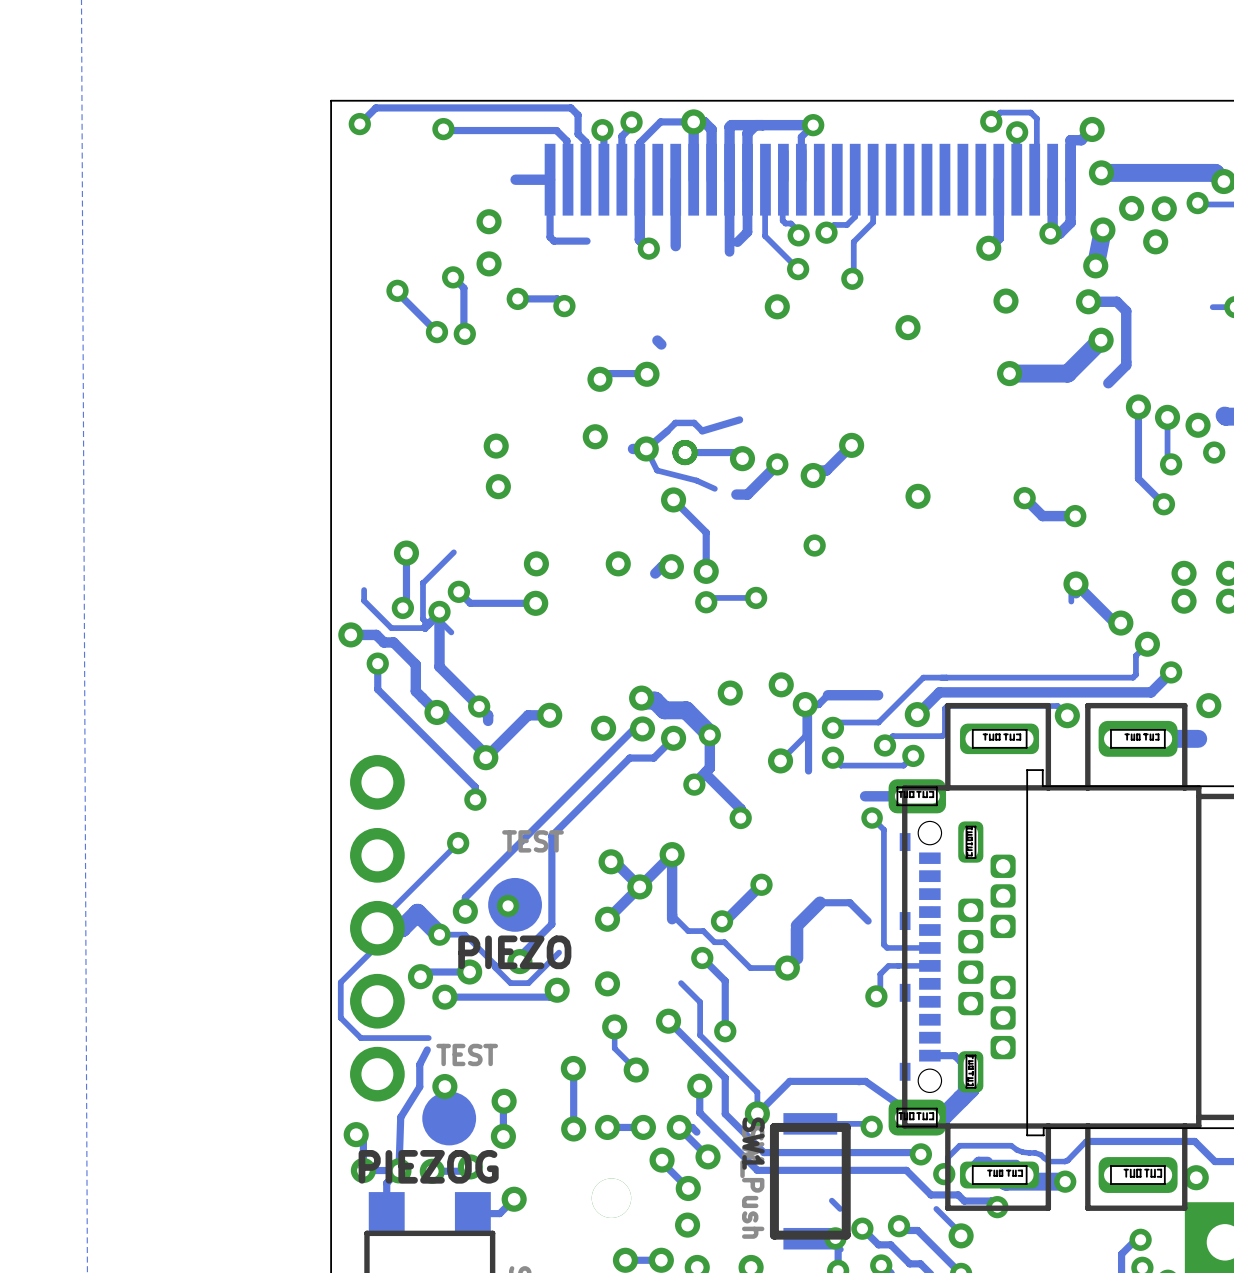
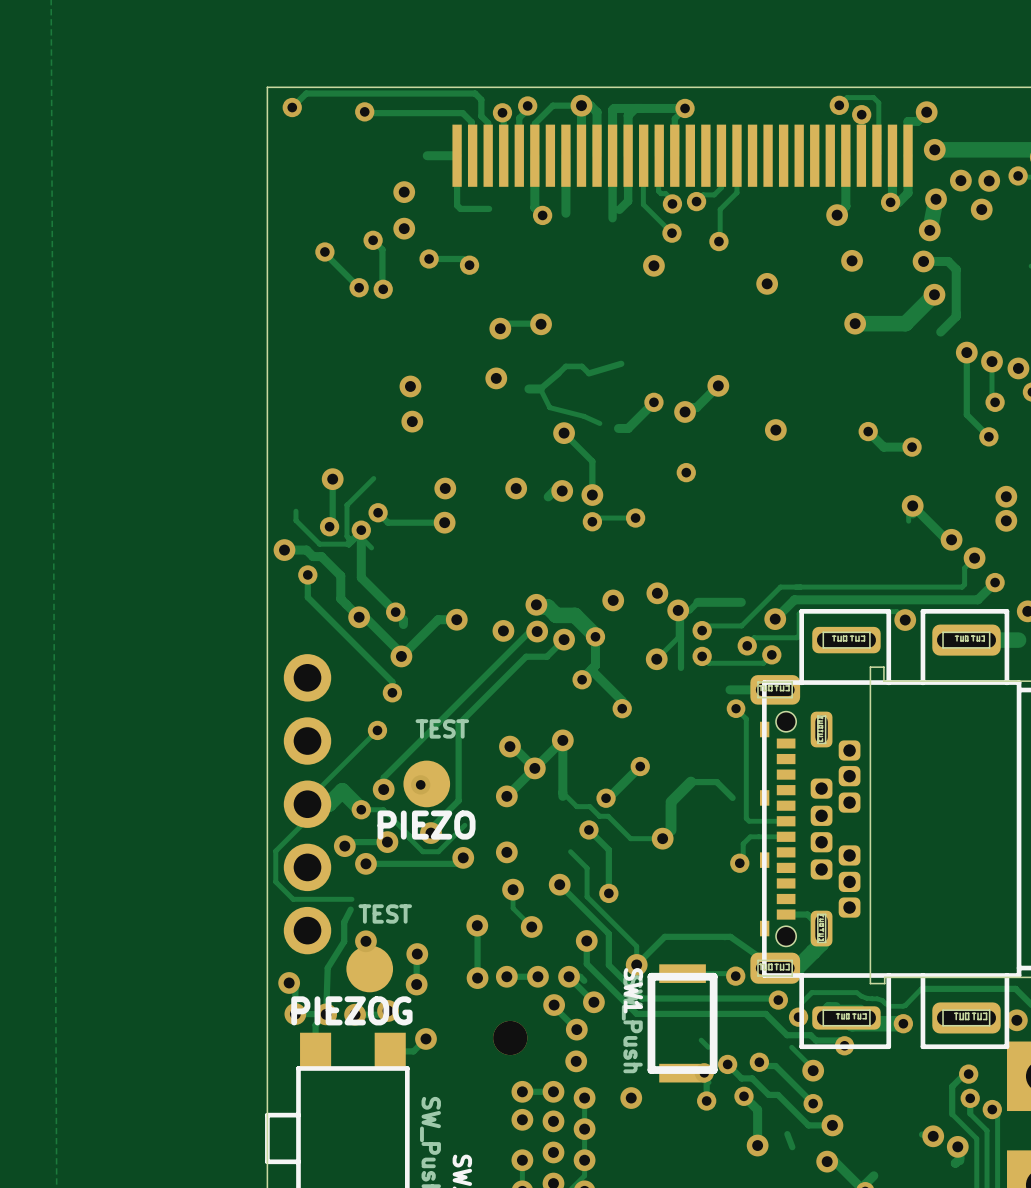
track: (657, 340) (661, 344) -> none
via: (646, 448) -> none
track: (685, 452) (736, 452) (742, 458) -> none
via: (685, 452) -> none
via: (742, 458) -> none

